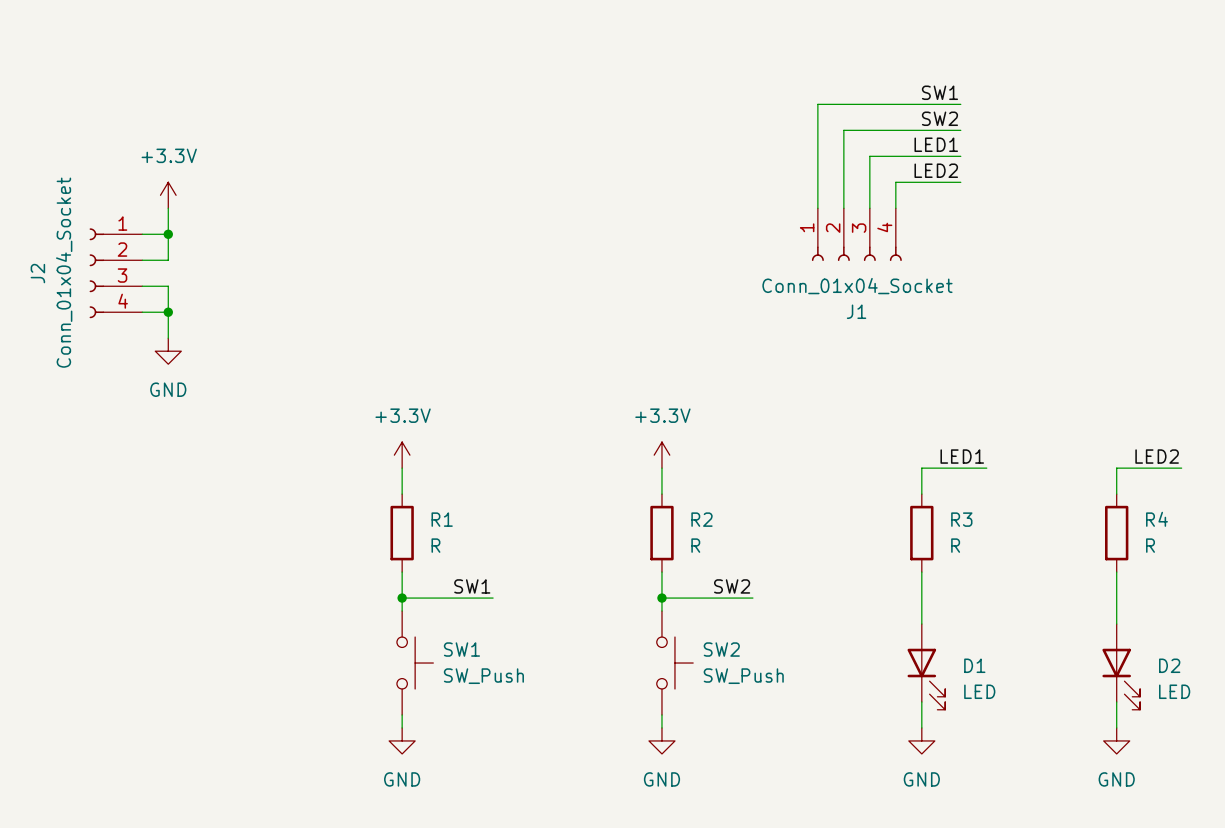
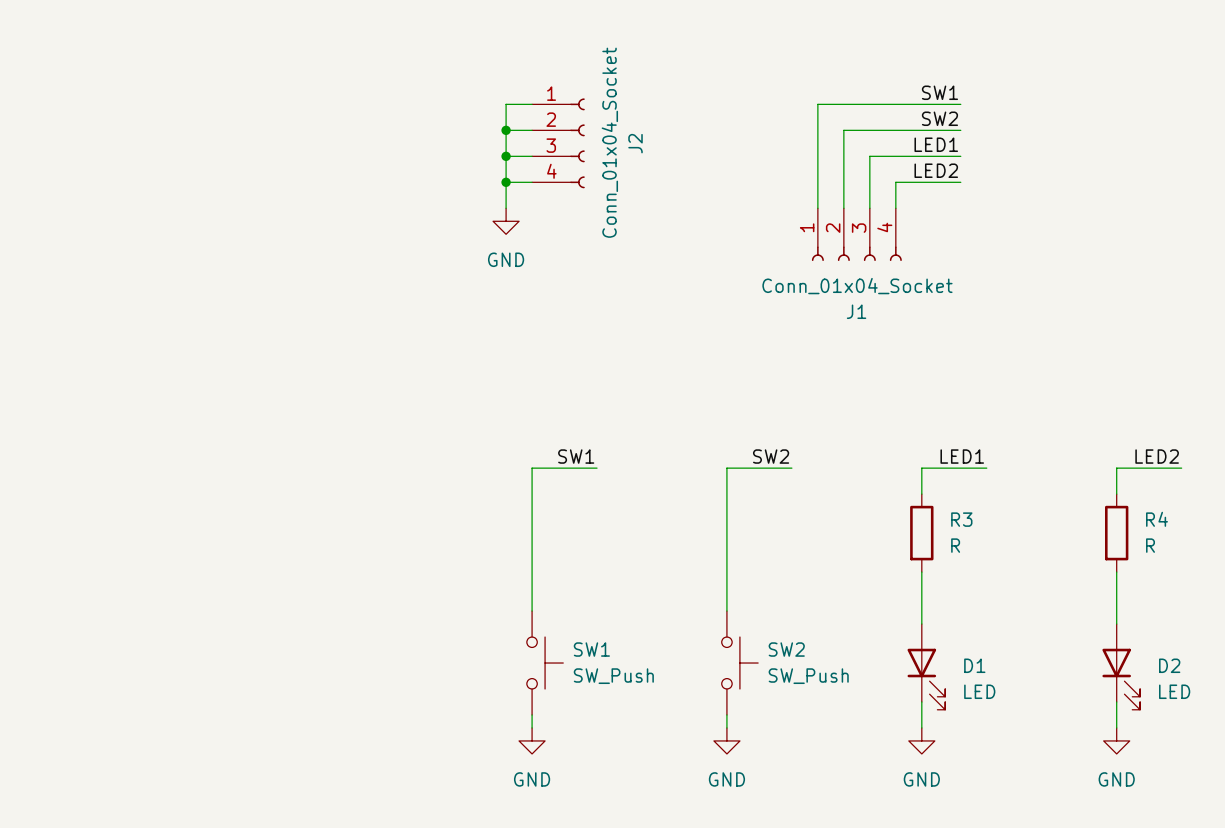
wire: none -> (532, 104) (506, 104) (506, 208)
wire: none -> (506, 130) (532, 130)
junction: none -> (506, 130)
wire: none -> (506, 156) (532, 156)
junction: none -> (506, 156)
wire: none -> (506, 182) (532, 182)
junction: none -> (506, 182)
power symbol: +3.3V (168, 195) -> none
wire: (168, 208) (168, 260) (142, 260) -> none
power symbol: none -> GND (506, 221)
wire: (142, 234) (168, 234) -> none
junction: (168, 234) -> none
J2 flip: as is (96, 273) -> left-right (577, 143)
J2 position: (115, 273) -> (558, 143)
wire: (142, 286) (168, 286) (168, 338) -> none
wire: (142, 312) (168, 312) -> none
junction: (168, 312) -> none
power symbol: GND (168, 351) -> none
power symbol: +3.3V (402, 455) -> none
power symbol: +3.3V (661, 455) -> none
wire: (402, 468) (402, 494) -> none
wire: none -> (597, 468) (532, 468) (532, 611)
wire: (661, 468) (661, 494) -> none
wire: none -> (791, 468) (726, 468) (726, 611)
R1: R (402, 533) -> none
R2: R (661, 533) -> none
wire: (402, 572) (402, 611) -> none
wire: (661, 572) (661, 611) -> none
label position: SW1 (472, 586) -> SW1 (576, 456)
label position: SW2 (732, 586) -> SW2 (771, 456)
wire: (402, 598) (493, 598) -> none
junction: (402, 598) -> none
wire: (661, 598) (752, 598) -> none
junction: (661, 598) -> none
SW1 position: (415, 663) -> (545, 663)
SW2 position: (674, 663) -> (739, 663)
wire: (402, 714) (402, 727) -> (532, 714) (532, 727)
wire: (661, 714) (661, 727) -> (726, 714) (726, 727)
power symbol: GND (402, 740) -> none
power symbol: none -> GND (532, 740)
power symbol: GND (661, 740) -> none
power symbol: none -> GND (726, 740)

